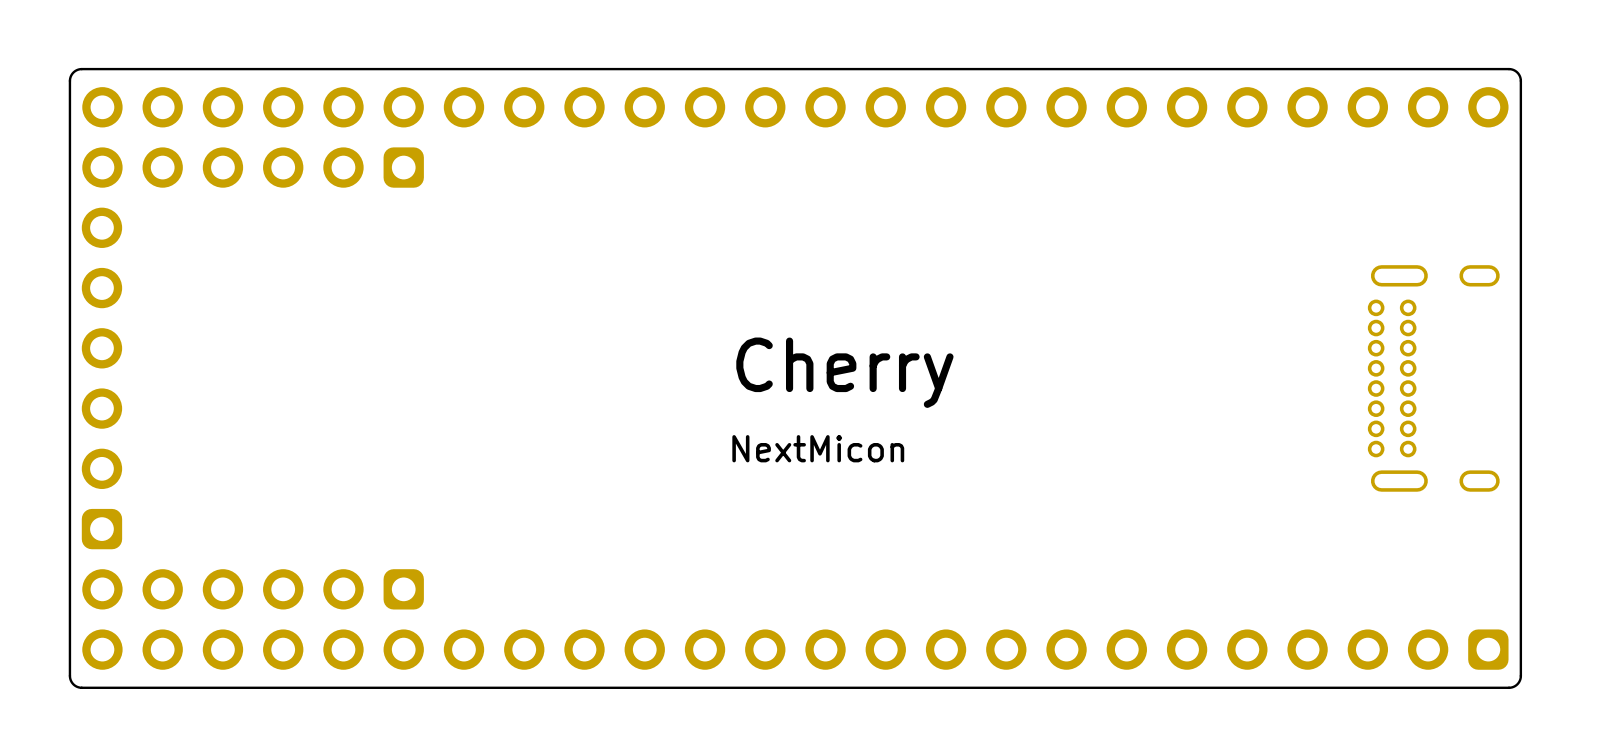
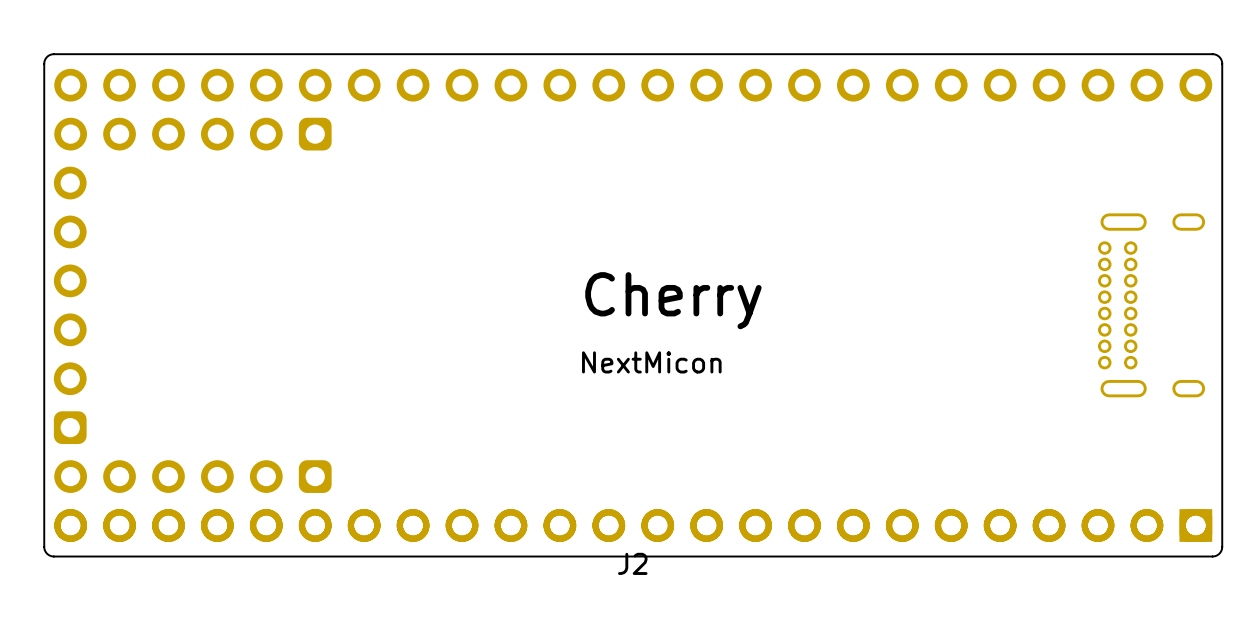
J2: none -> (633, 525)

